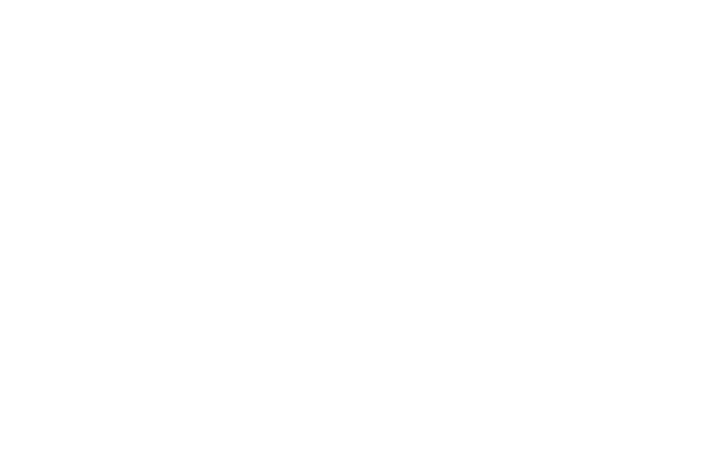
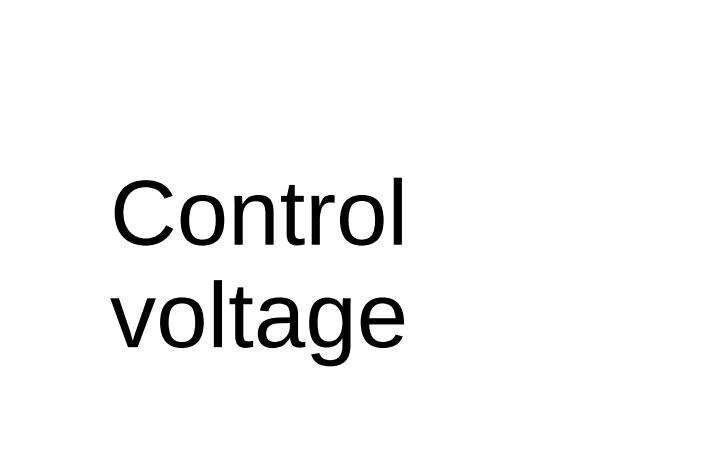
text: none -> Control (258, 211)
text: none -> voltage (257, 323)

